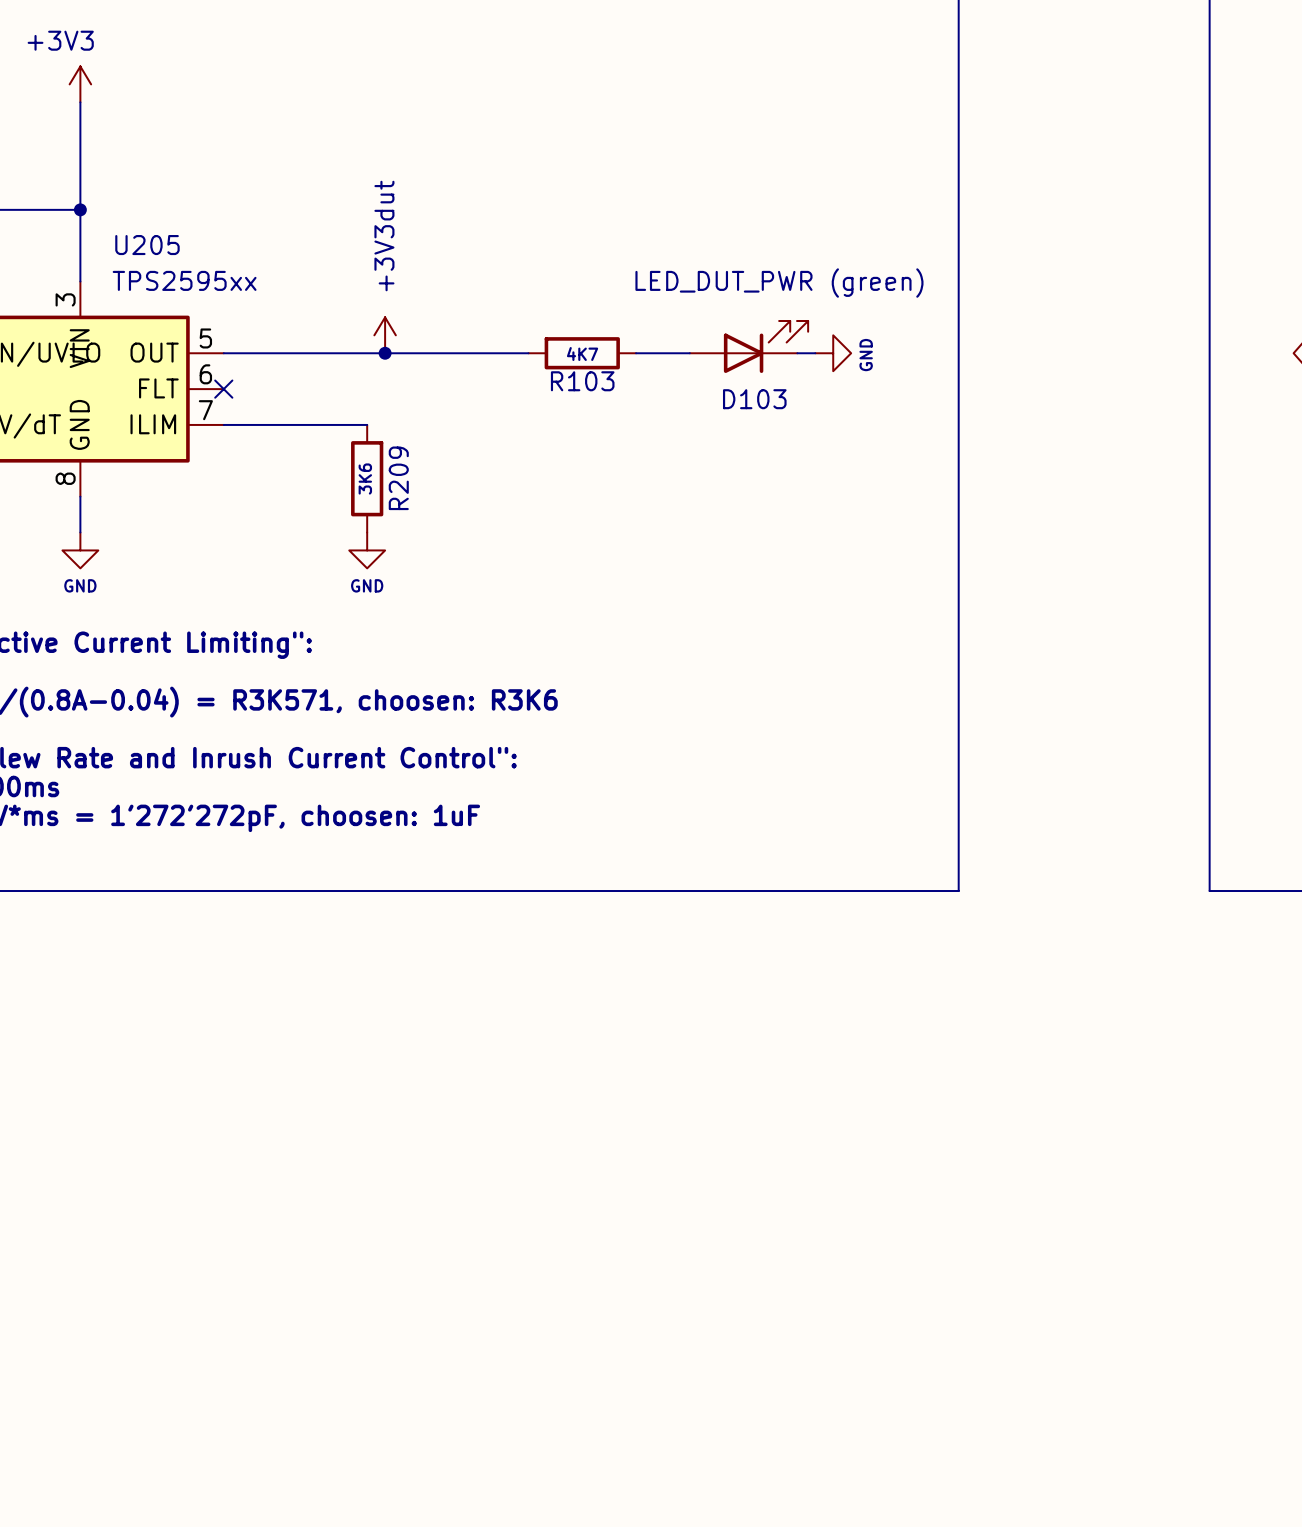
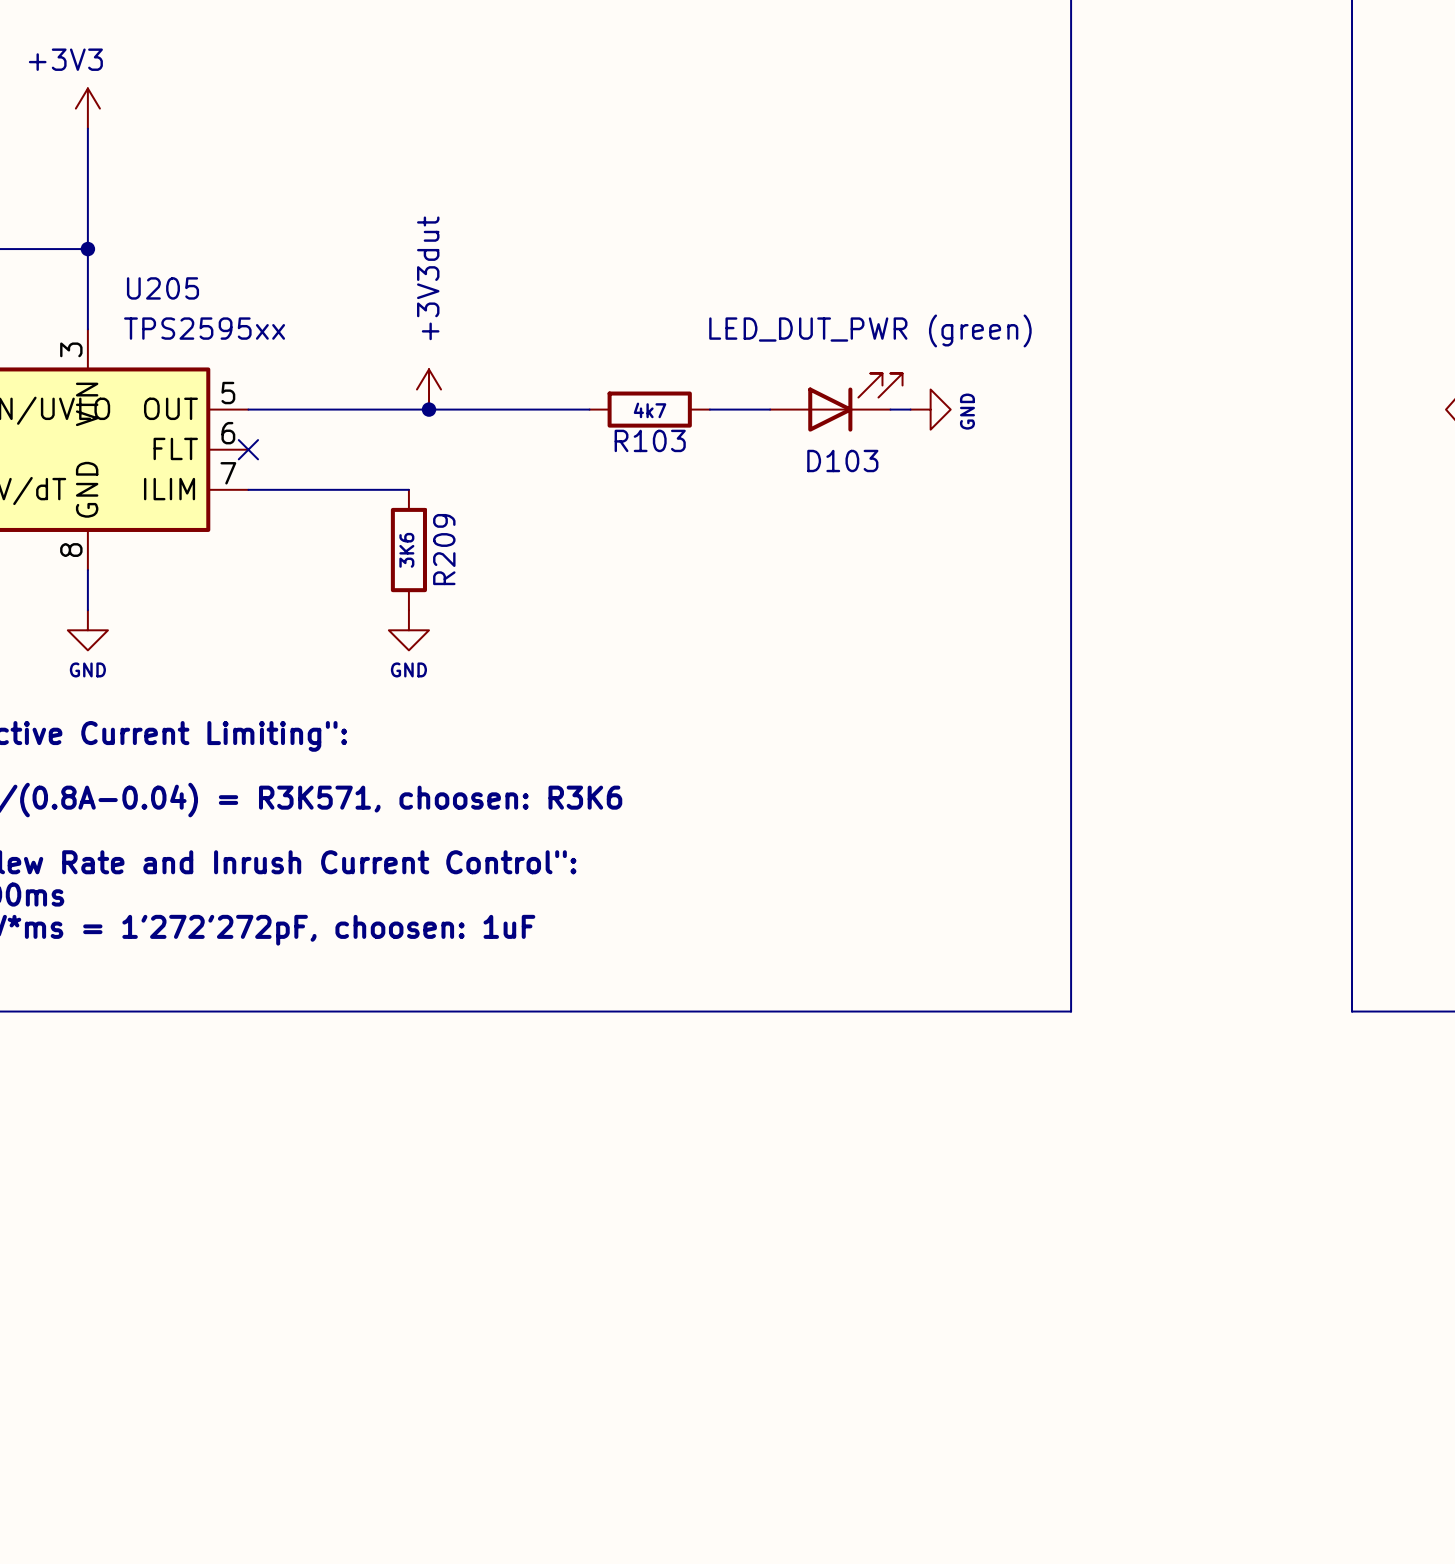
R103 value: 4K7 (582, 354) -> 4k7 (650, 410)

